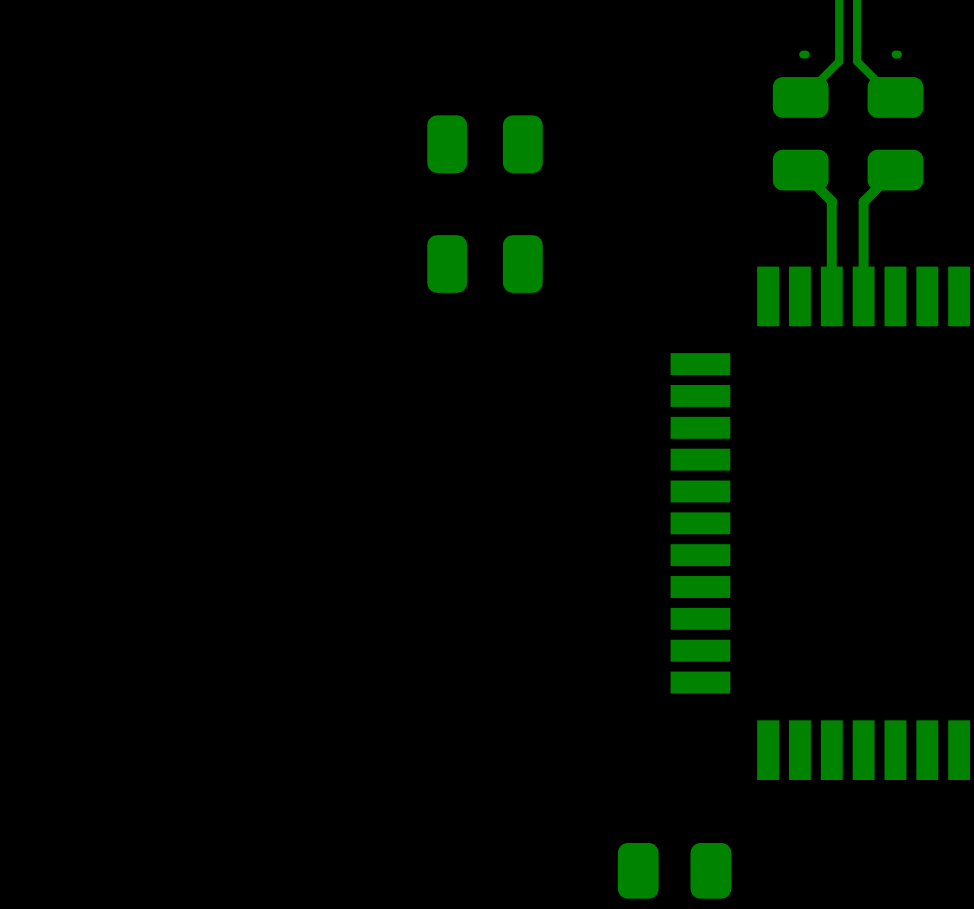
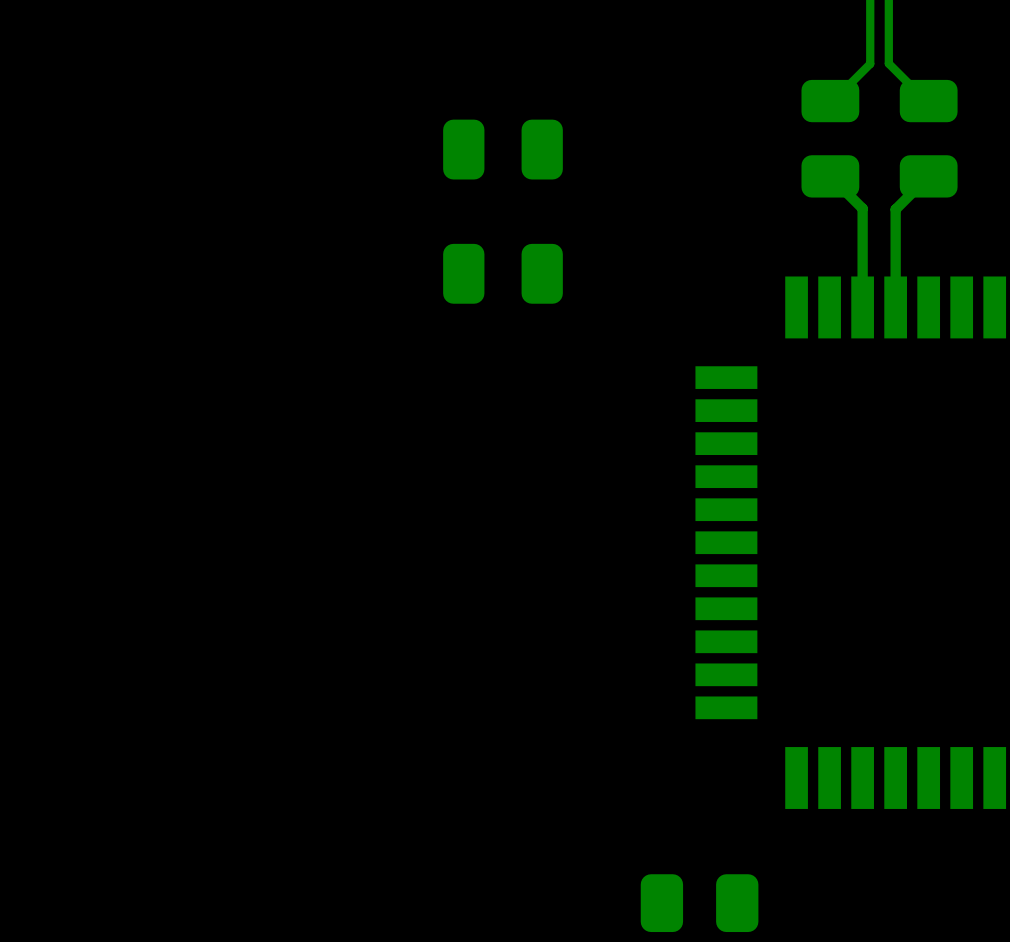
bottom track: (803, 54) (805, 54) -> none
bottom track: (895, 54) (897, 54) -> none

